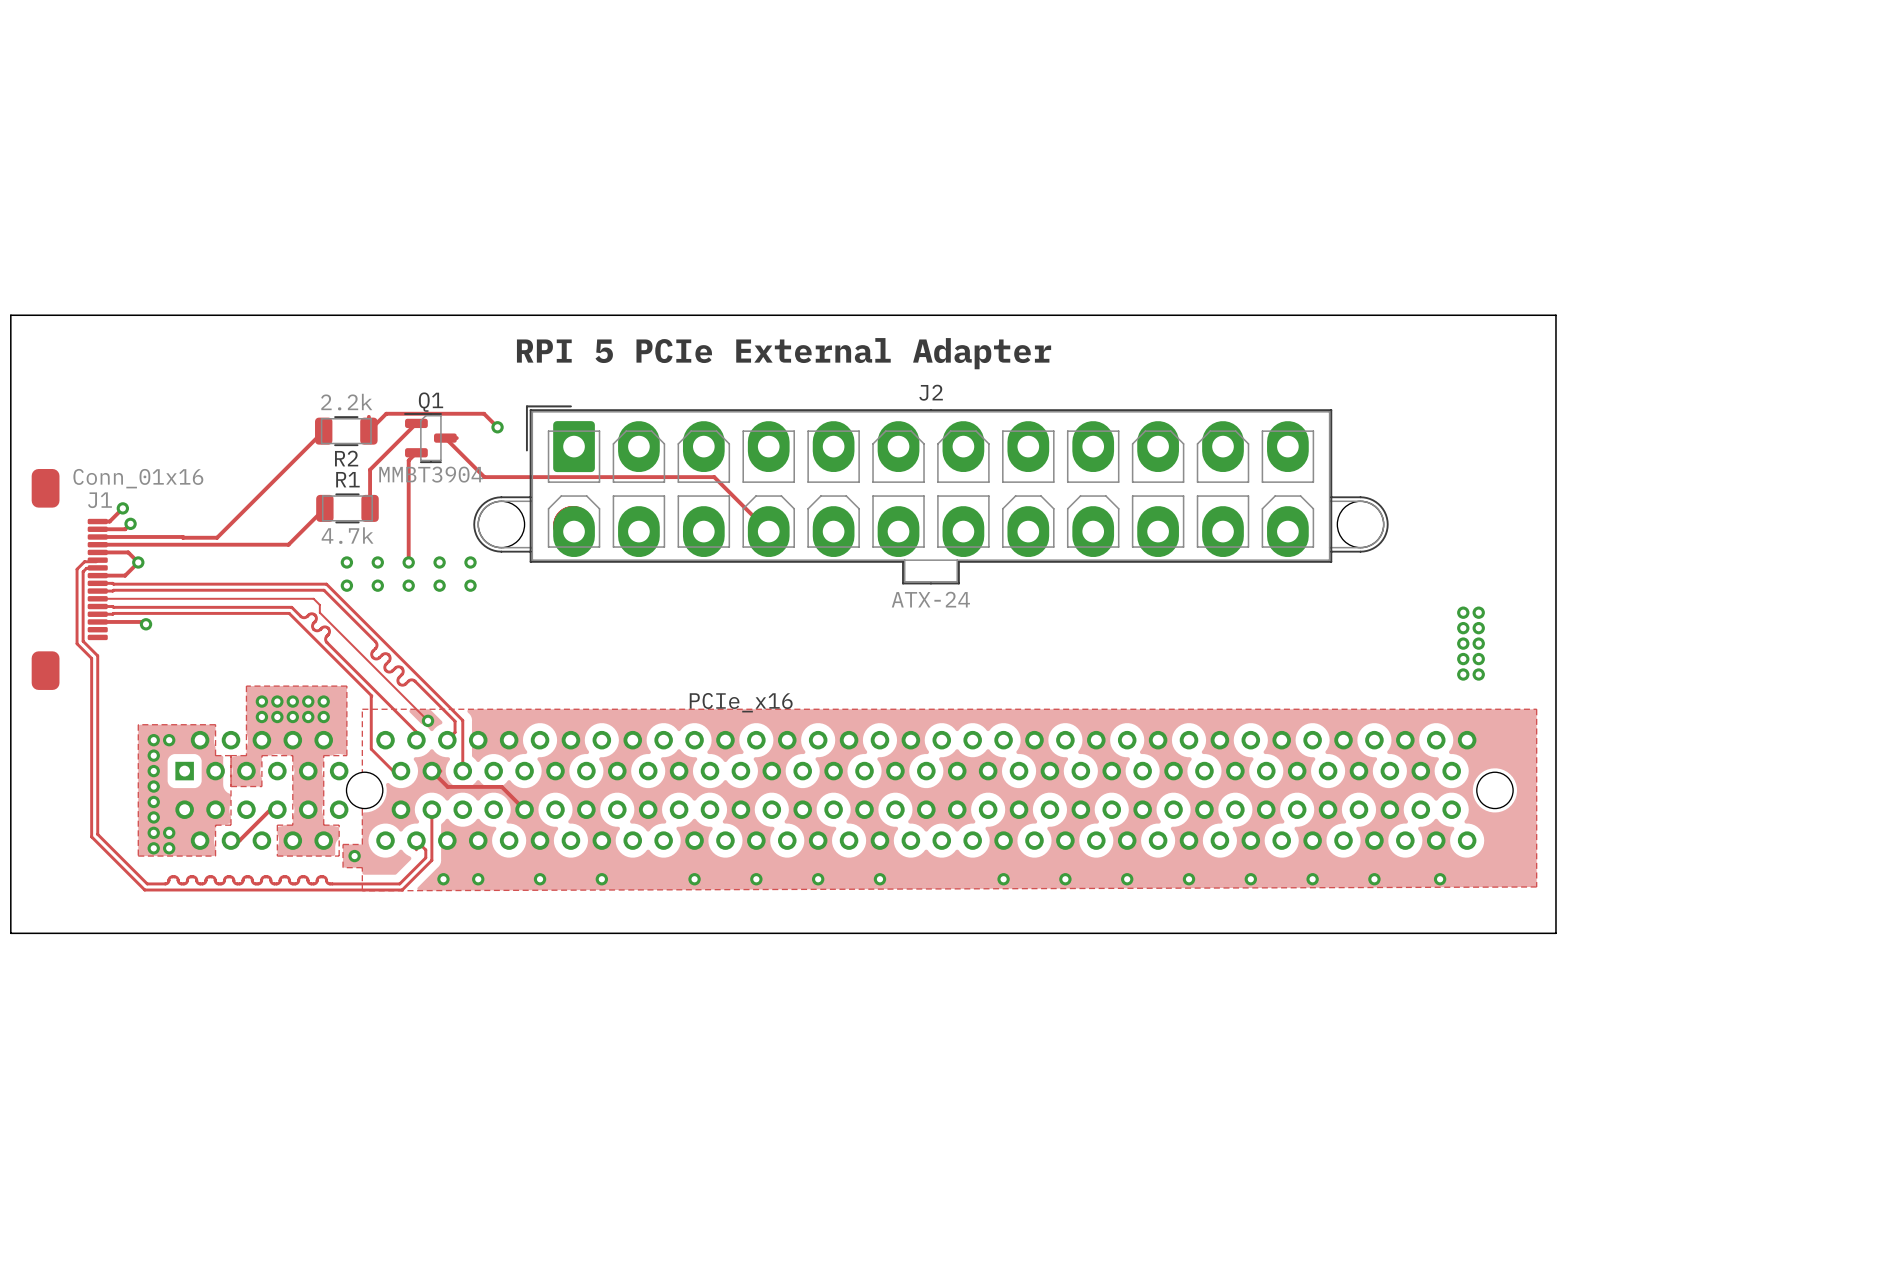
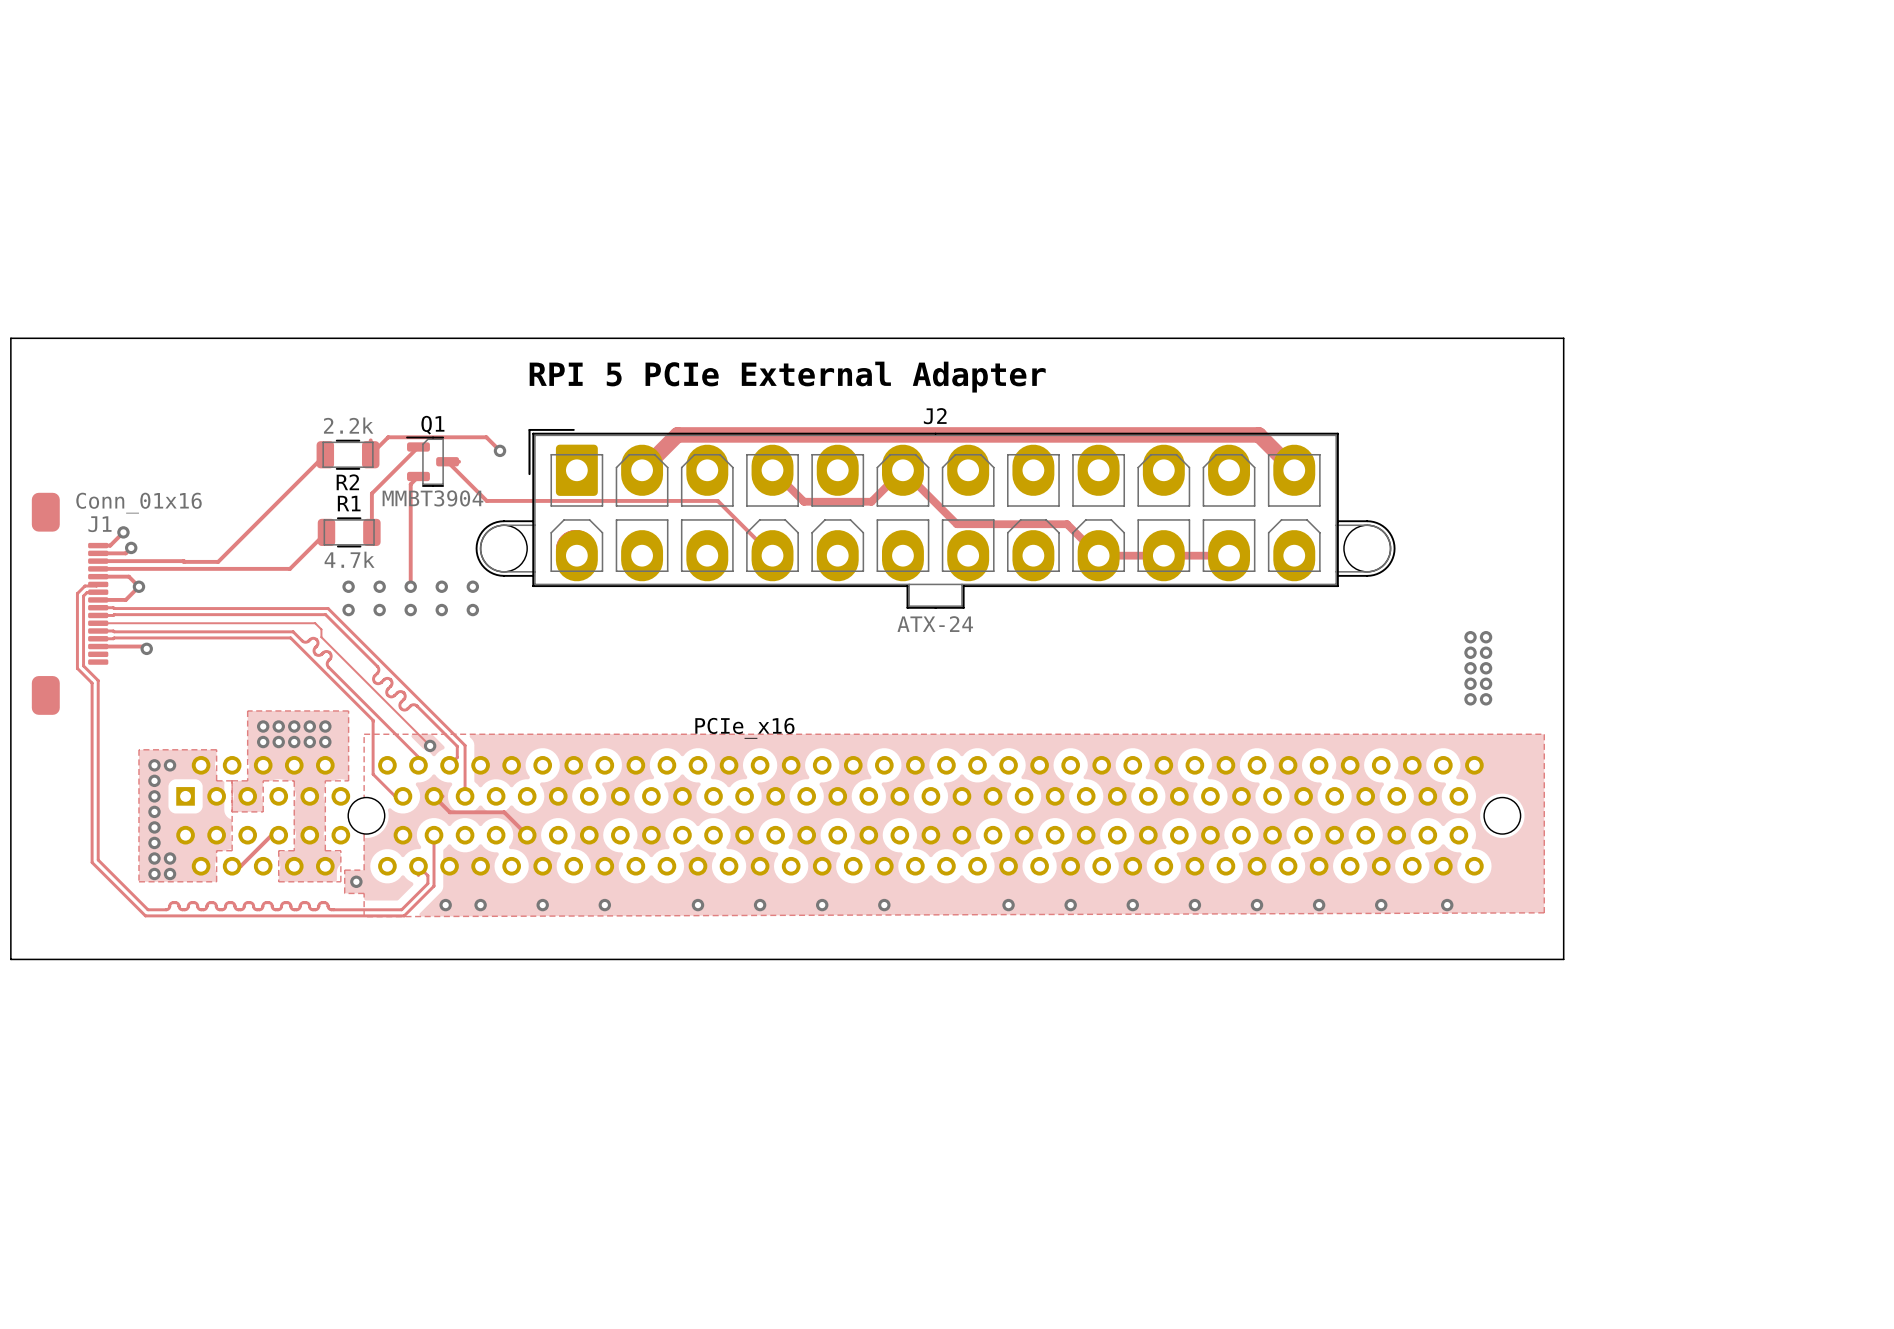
track: none -> (642, 470) (677, 434) (1258, 434) (1294, 470)
track: none -> (772, 470) (804, 501) (871, 501) (902, 470) (956, 524) (1067, 524) (1098, 555) (1229, 555)

